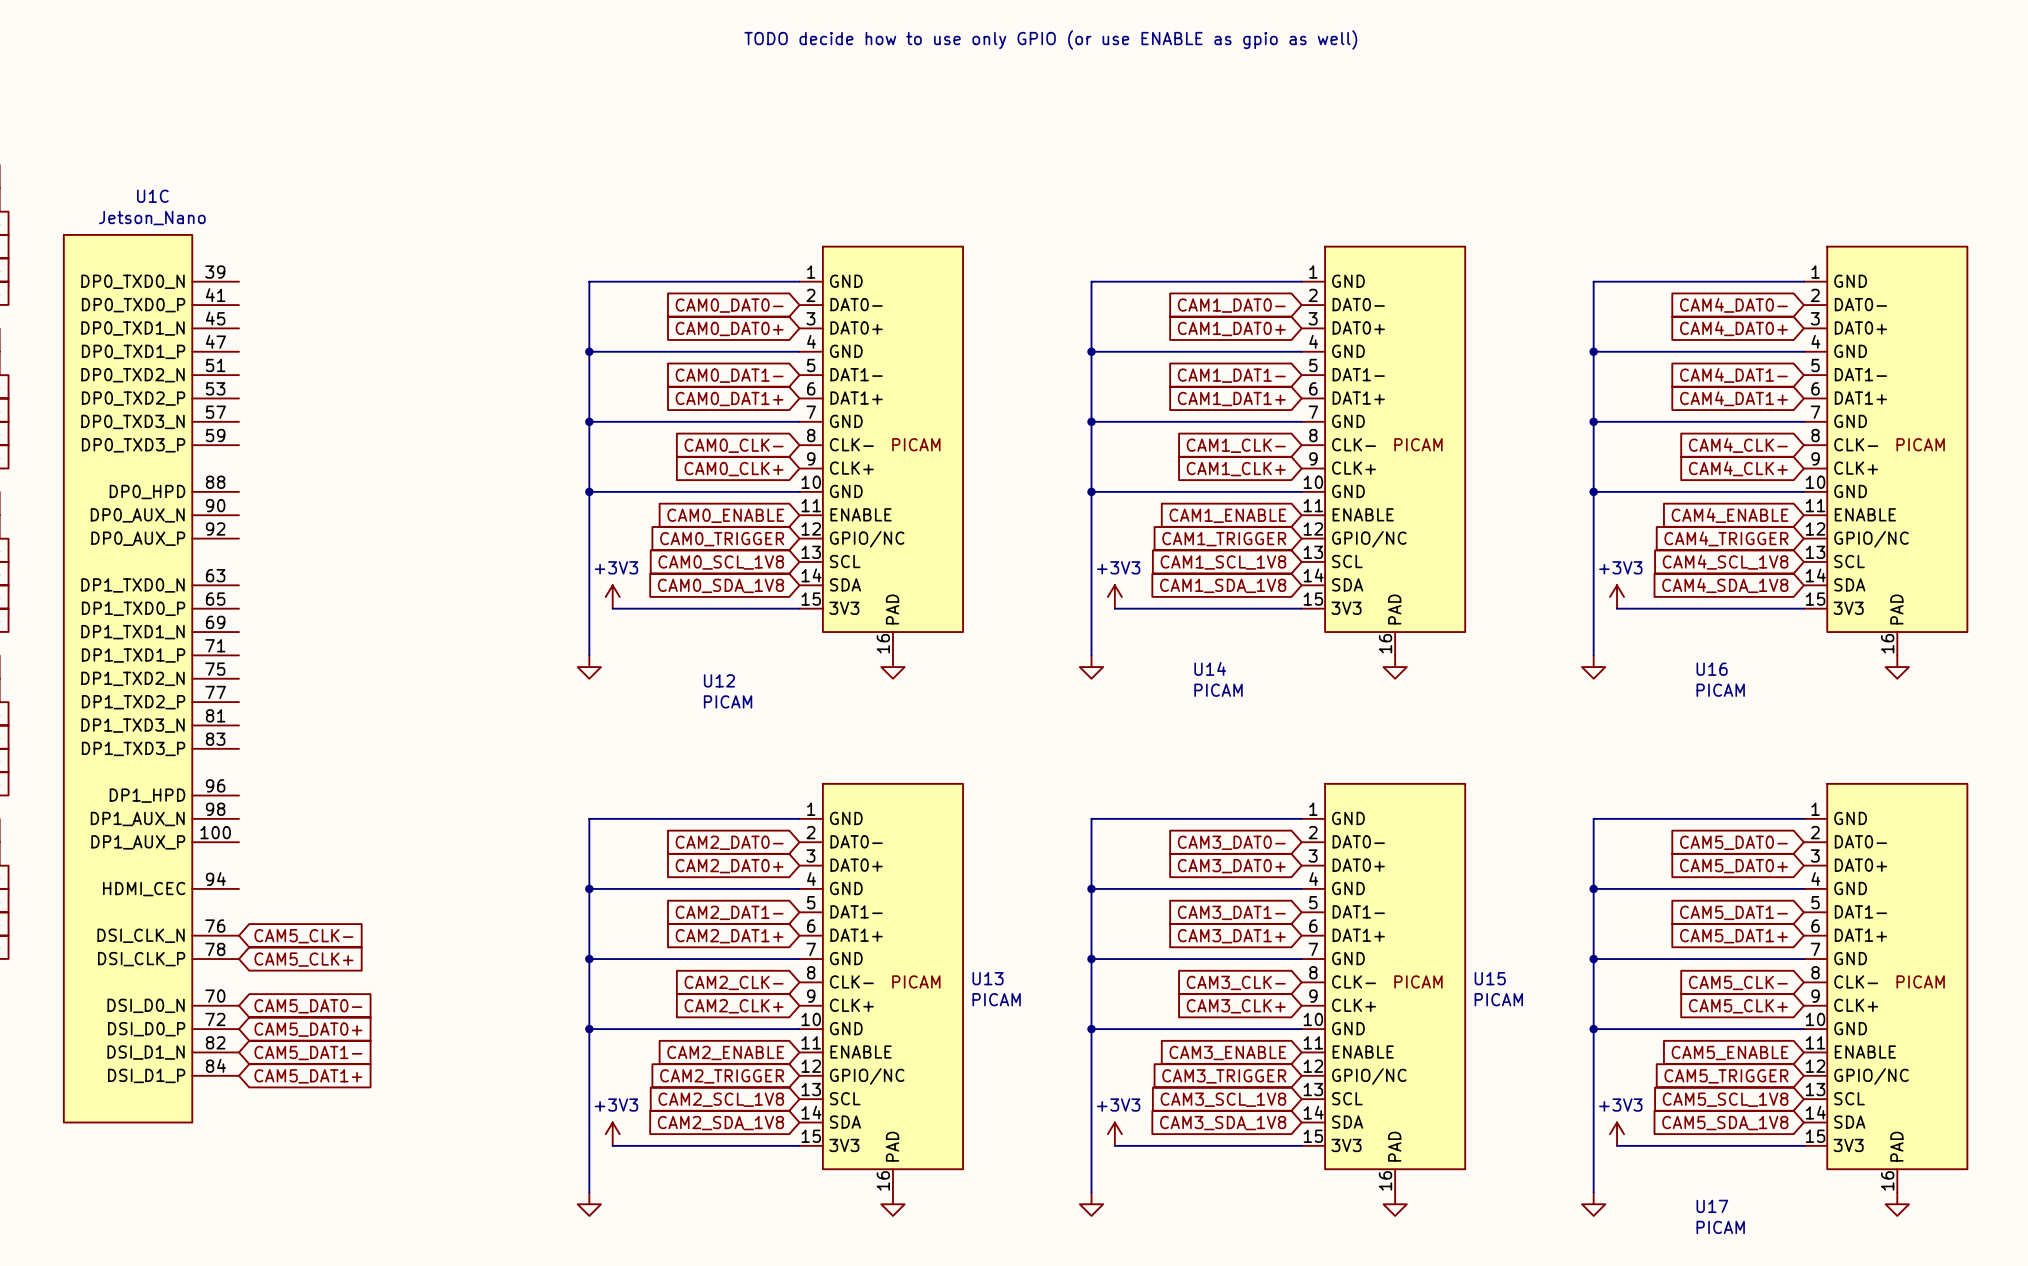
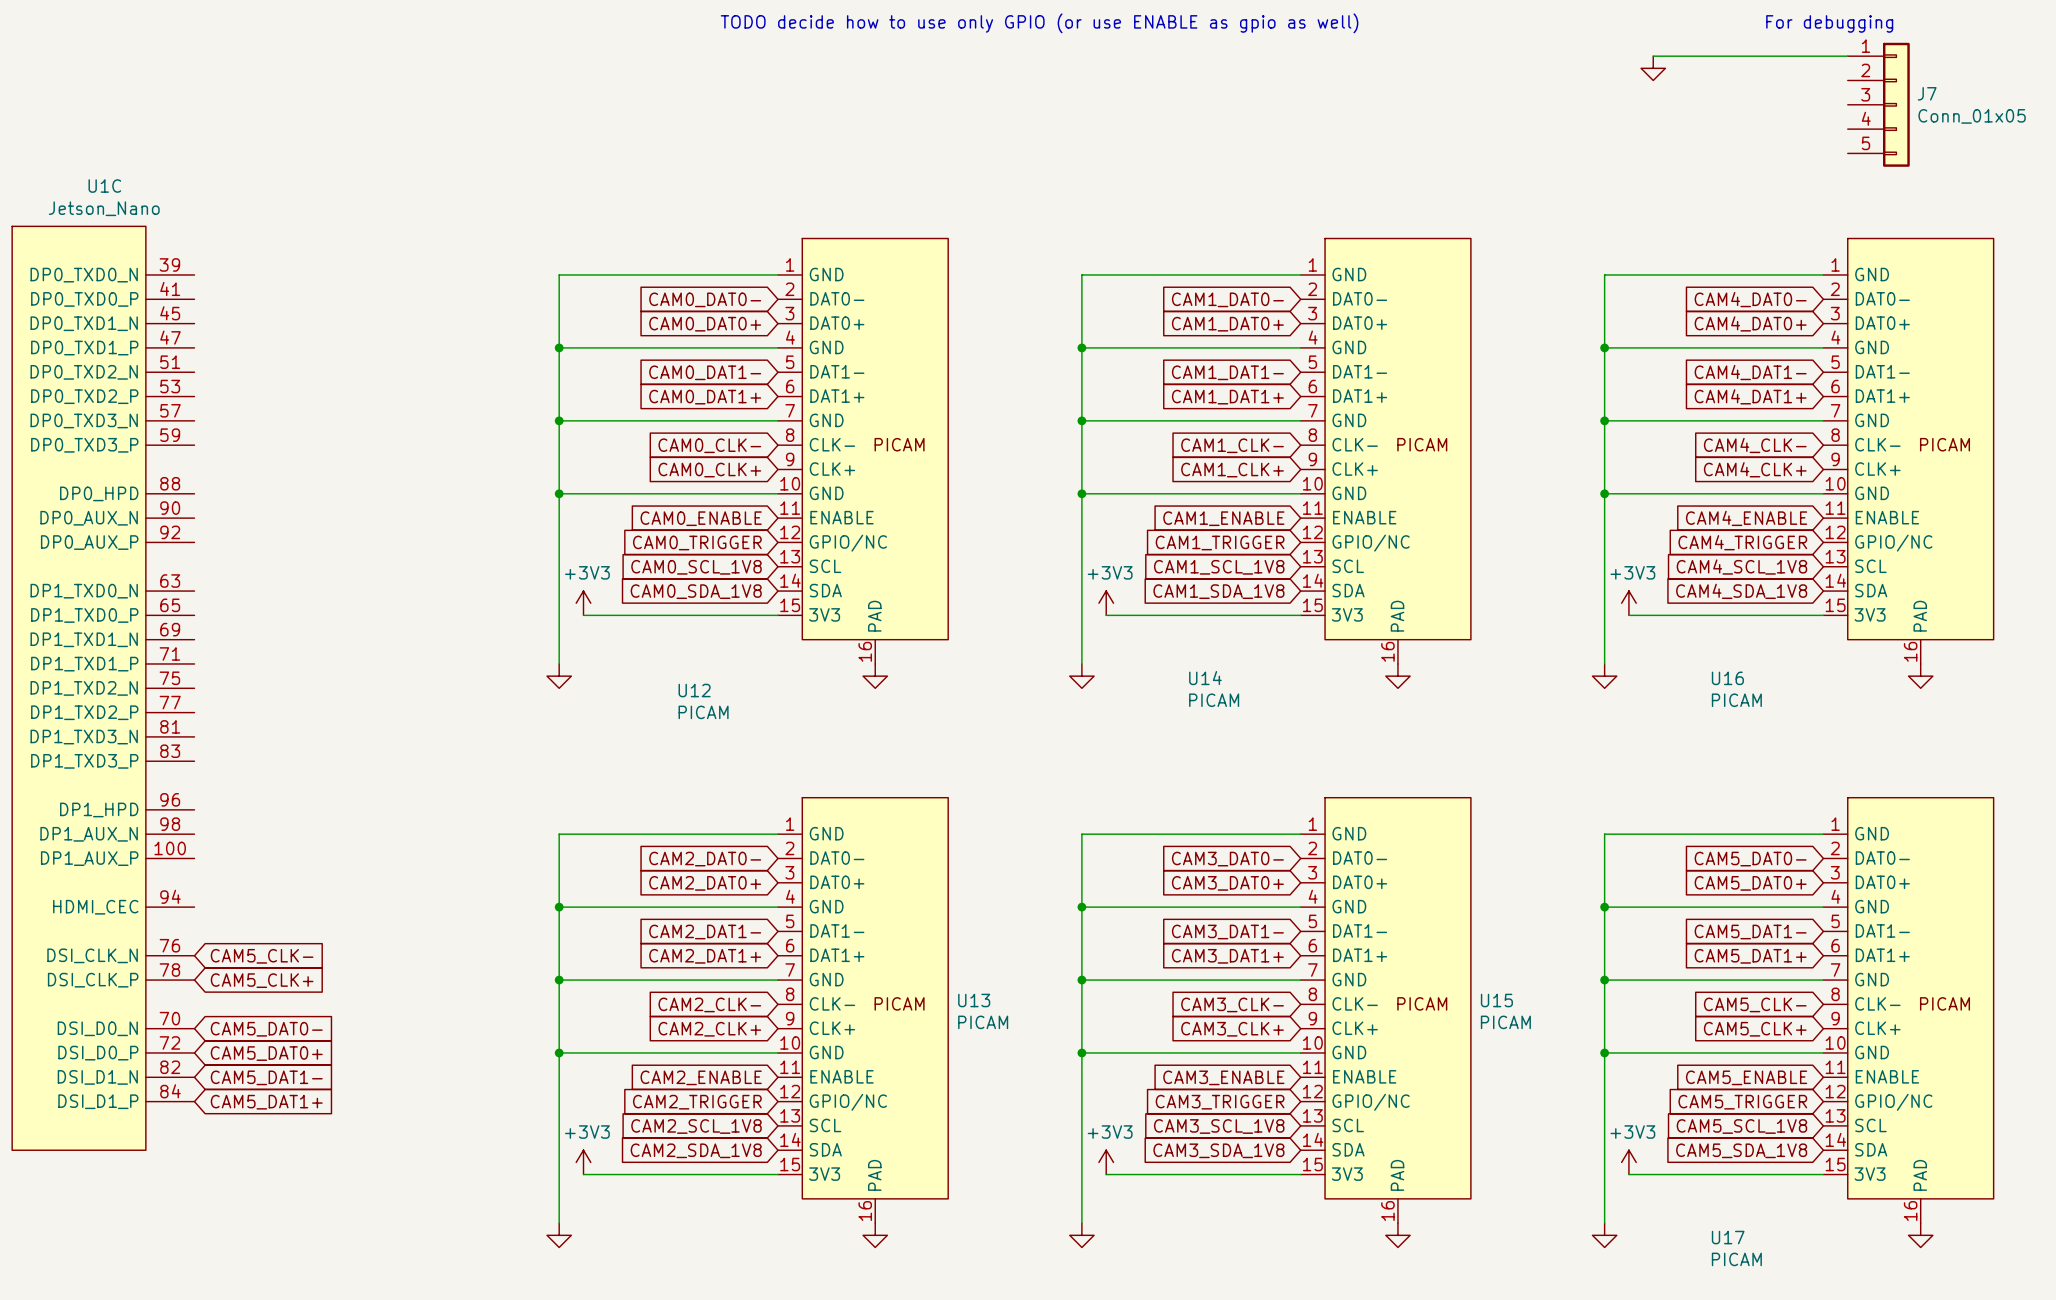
text: none -> For debugging (1829, 23)
wire: none -> (1653, 56) (1847, 56)
power symbol: none -> (1653, 68)
J7: none -> Conn_01x05 (1878, 104)

